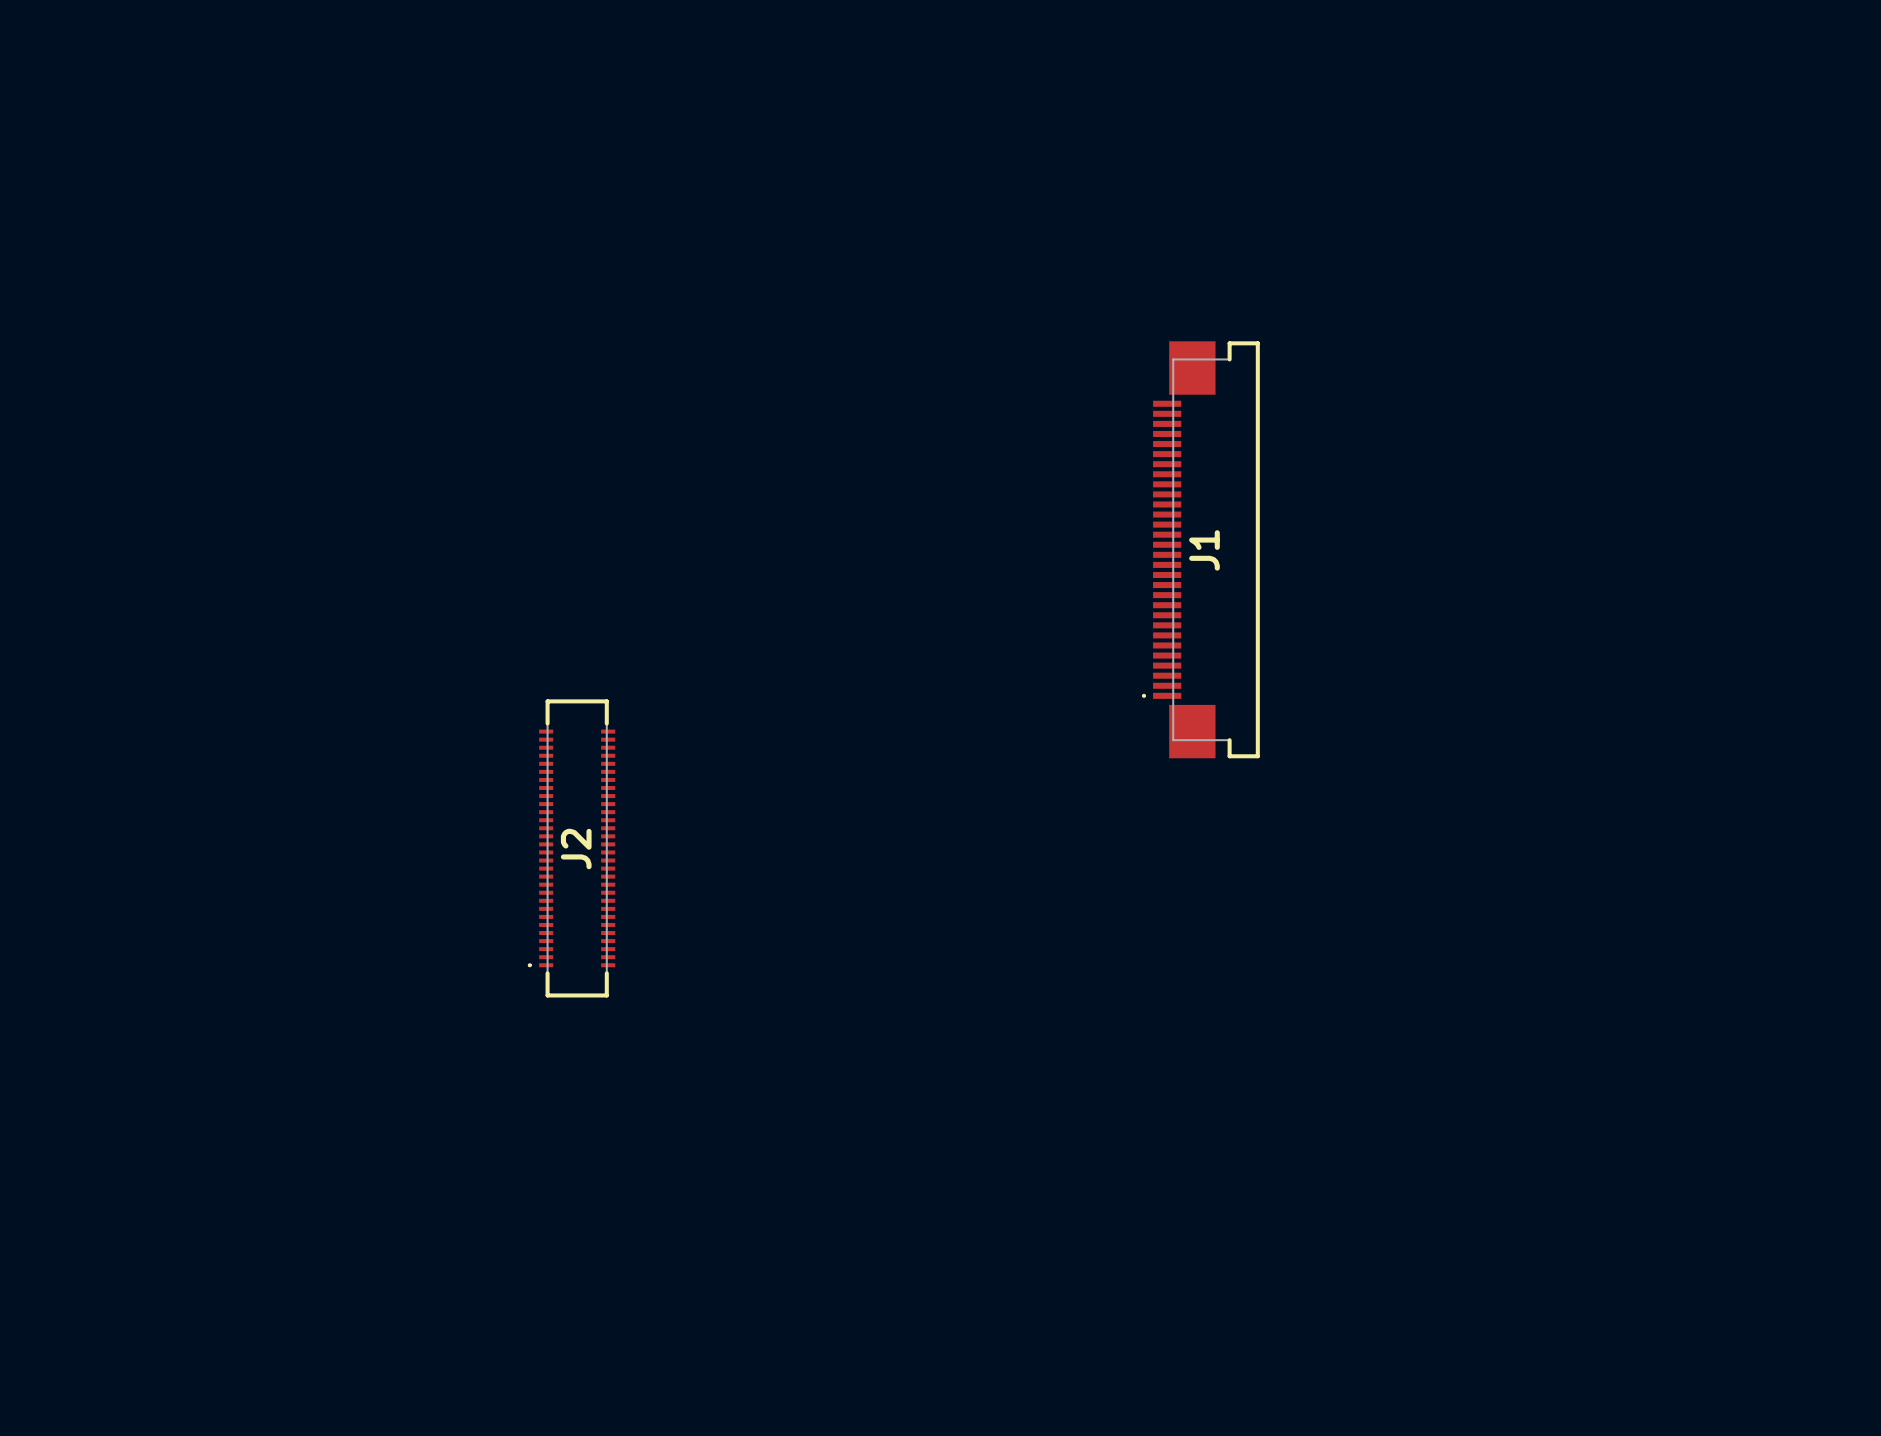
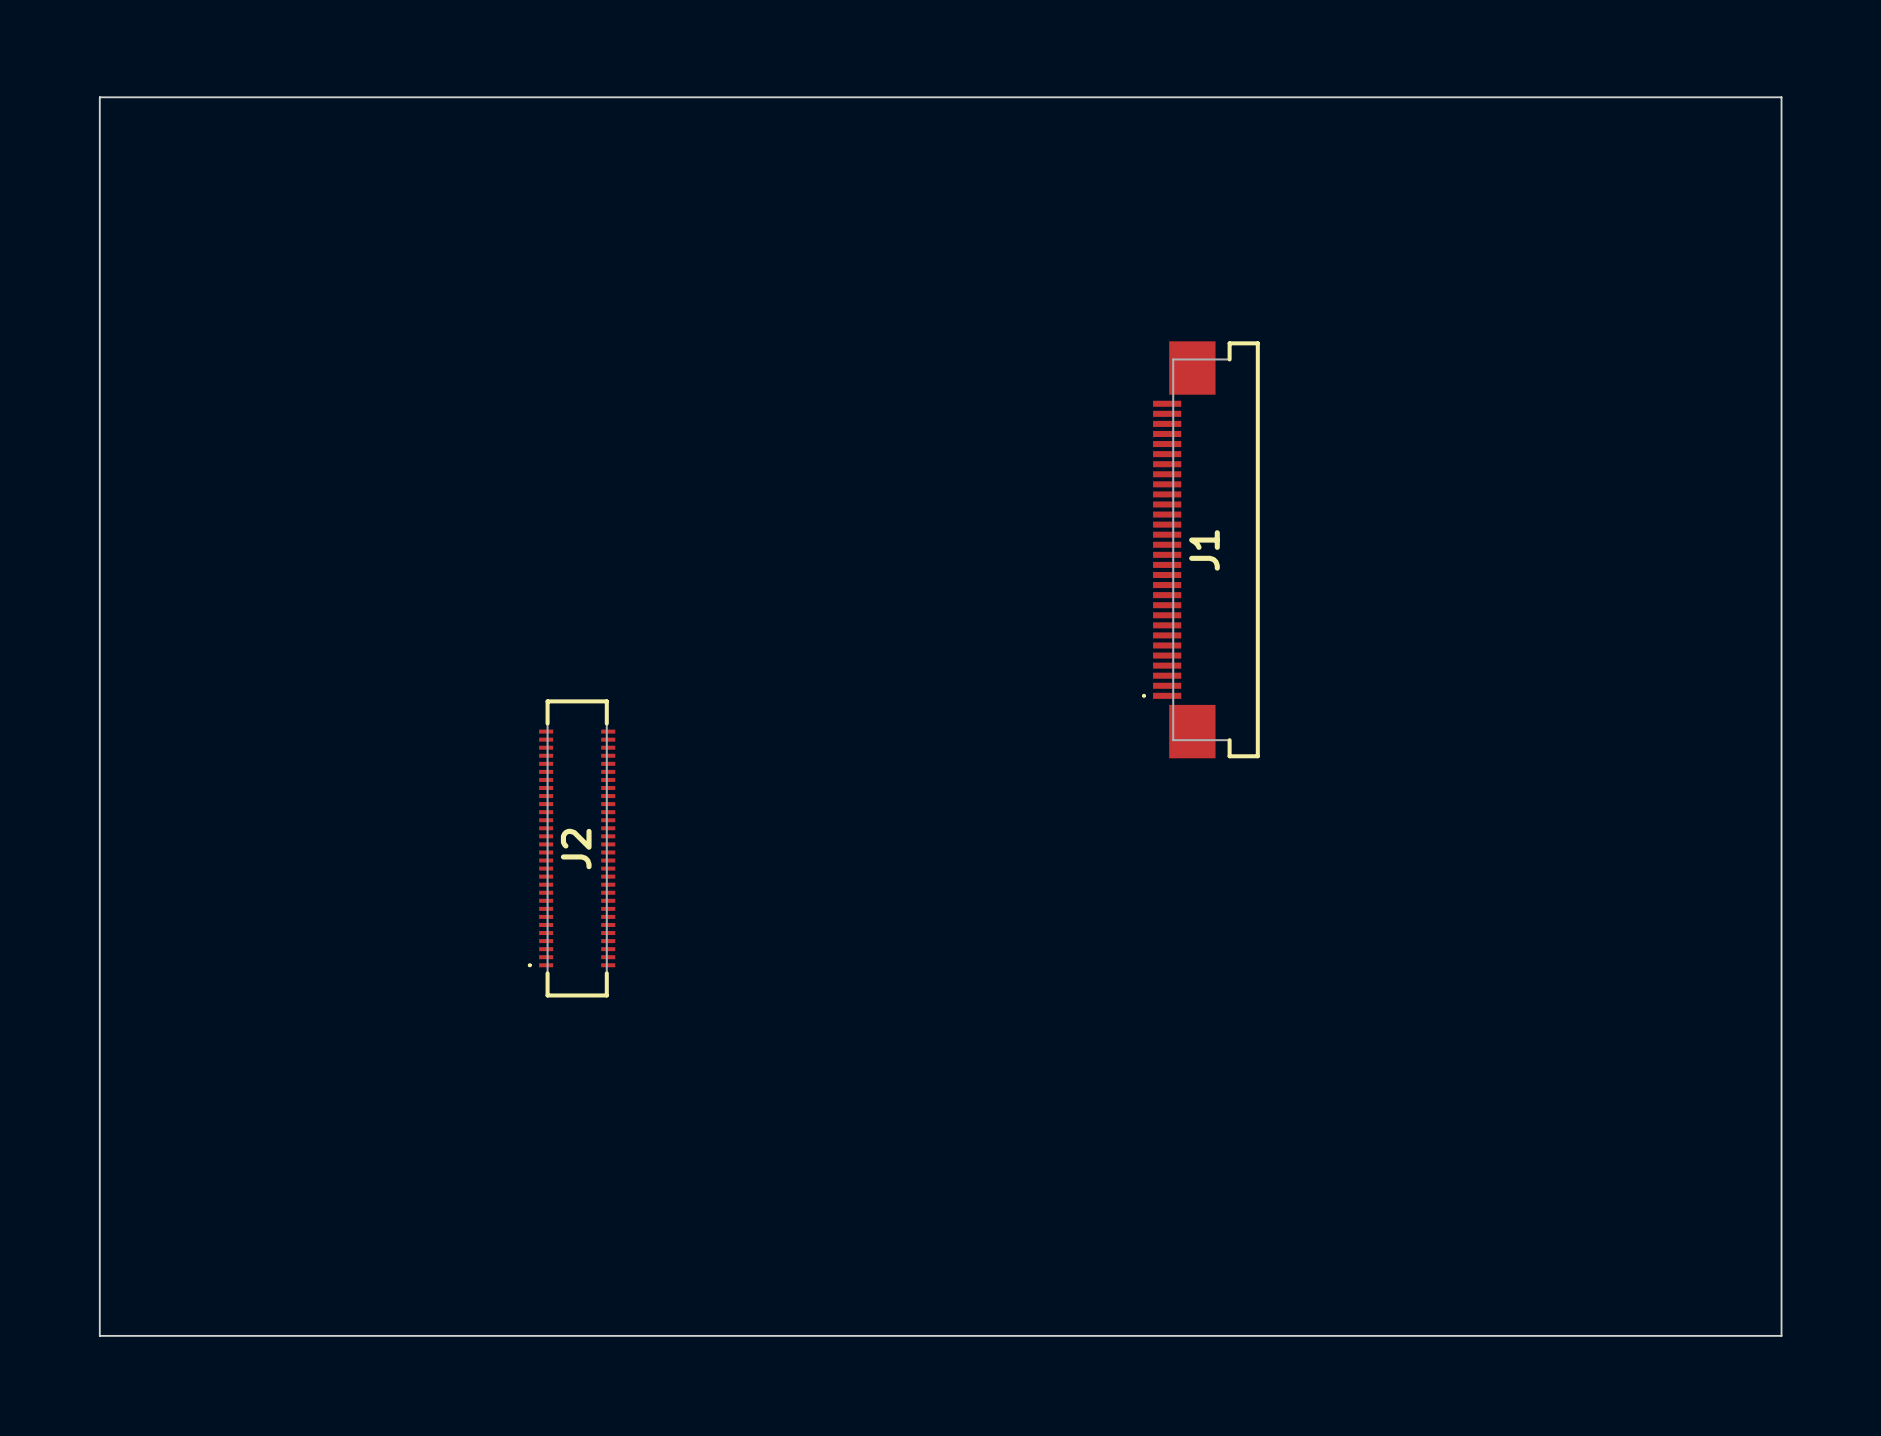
board edge: none -> (99, 97) (1781, 97) (1781, 1335) (99, 1335) (99, 97)

